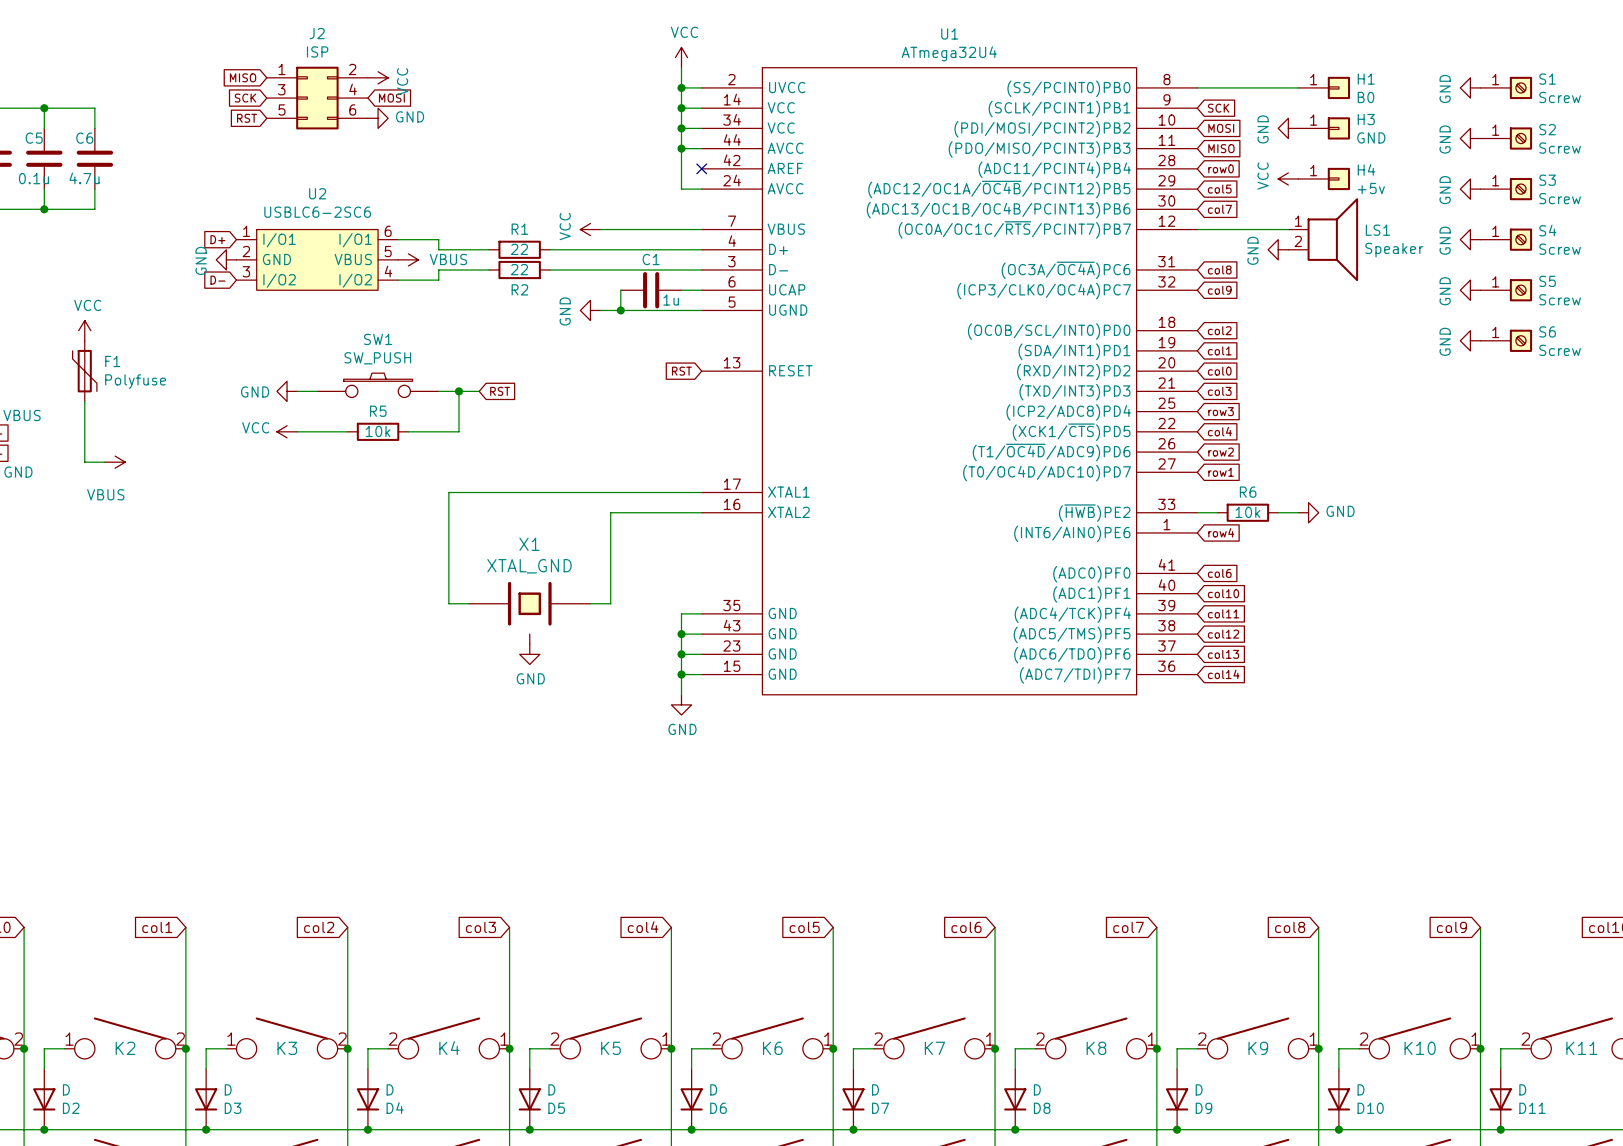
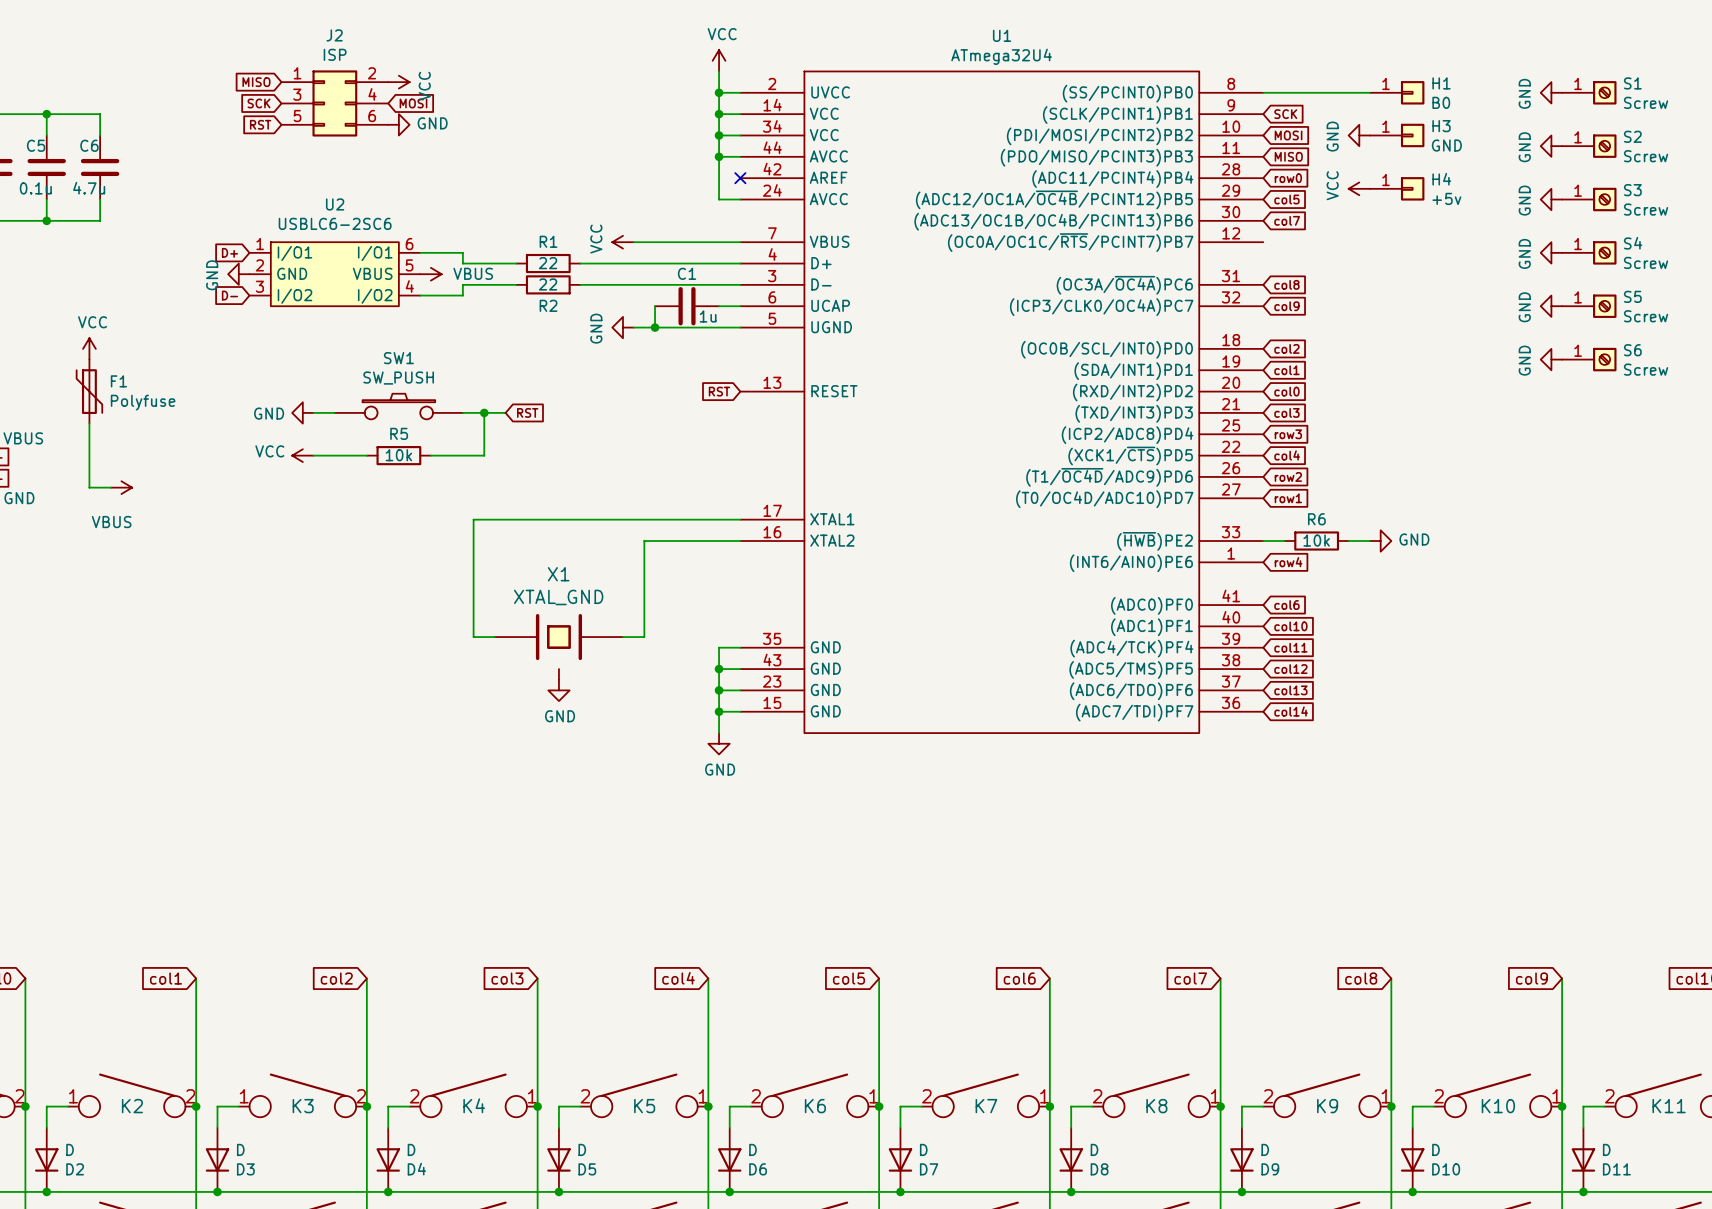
wire: (1197, 229) (1288, 229) -> none
LS1: Speaker (1323, 239) -> none
power symbol: GND (1278, 249) -> none

